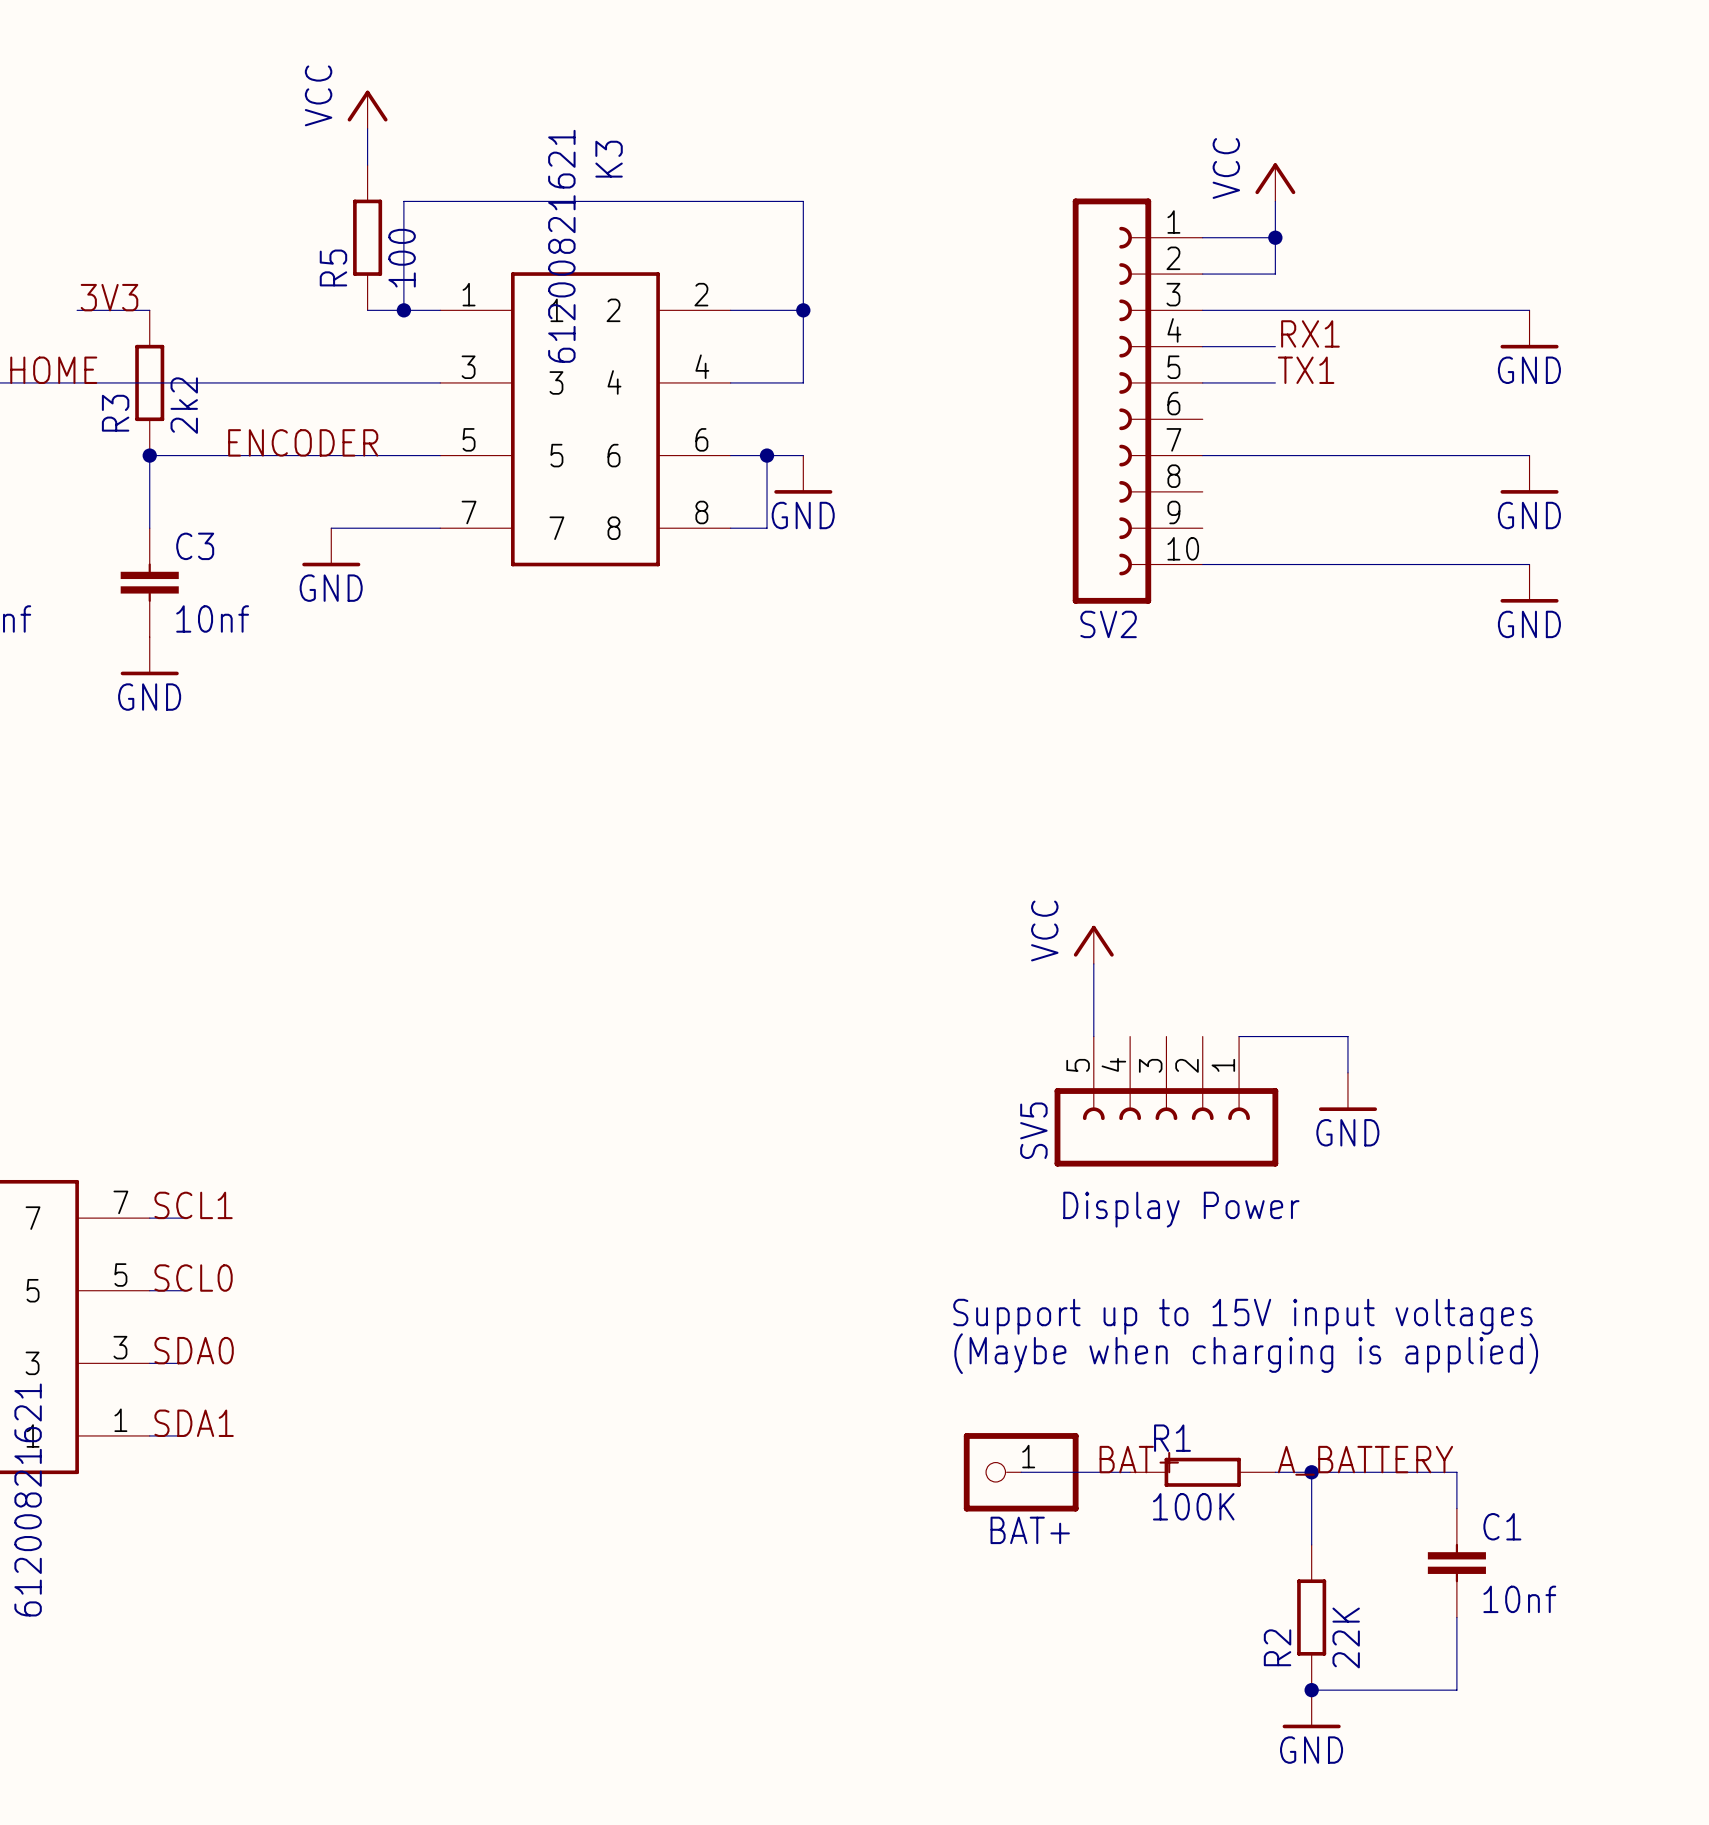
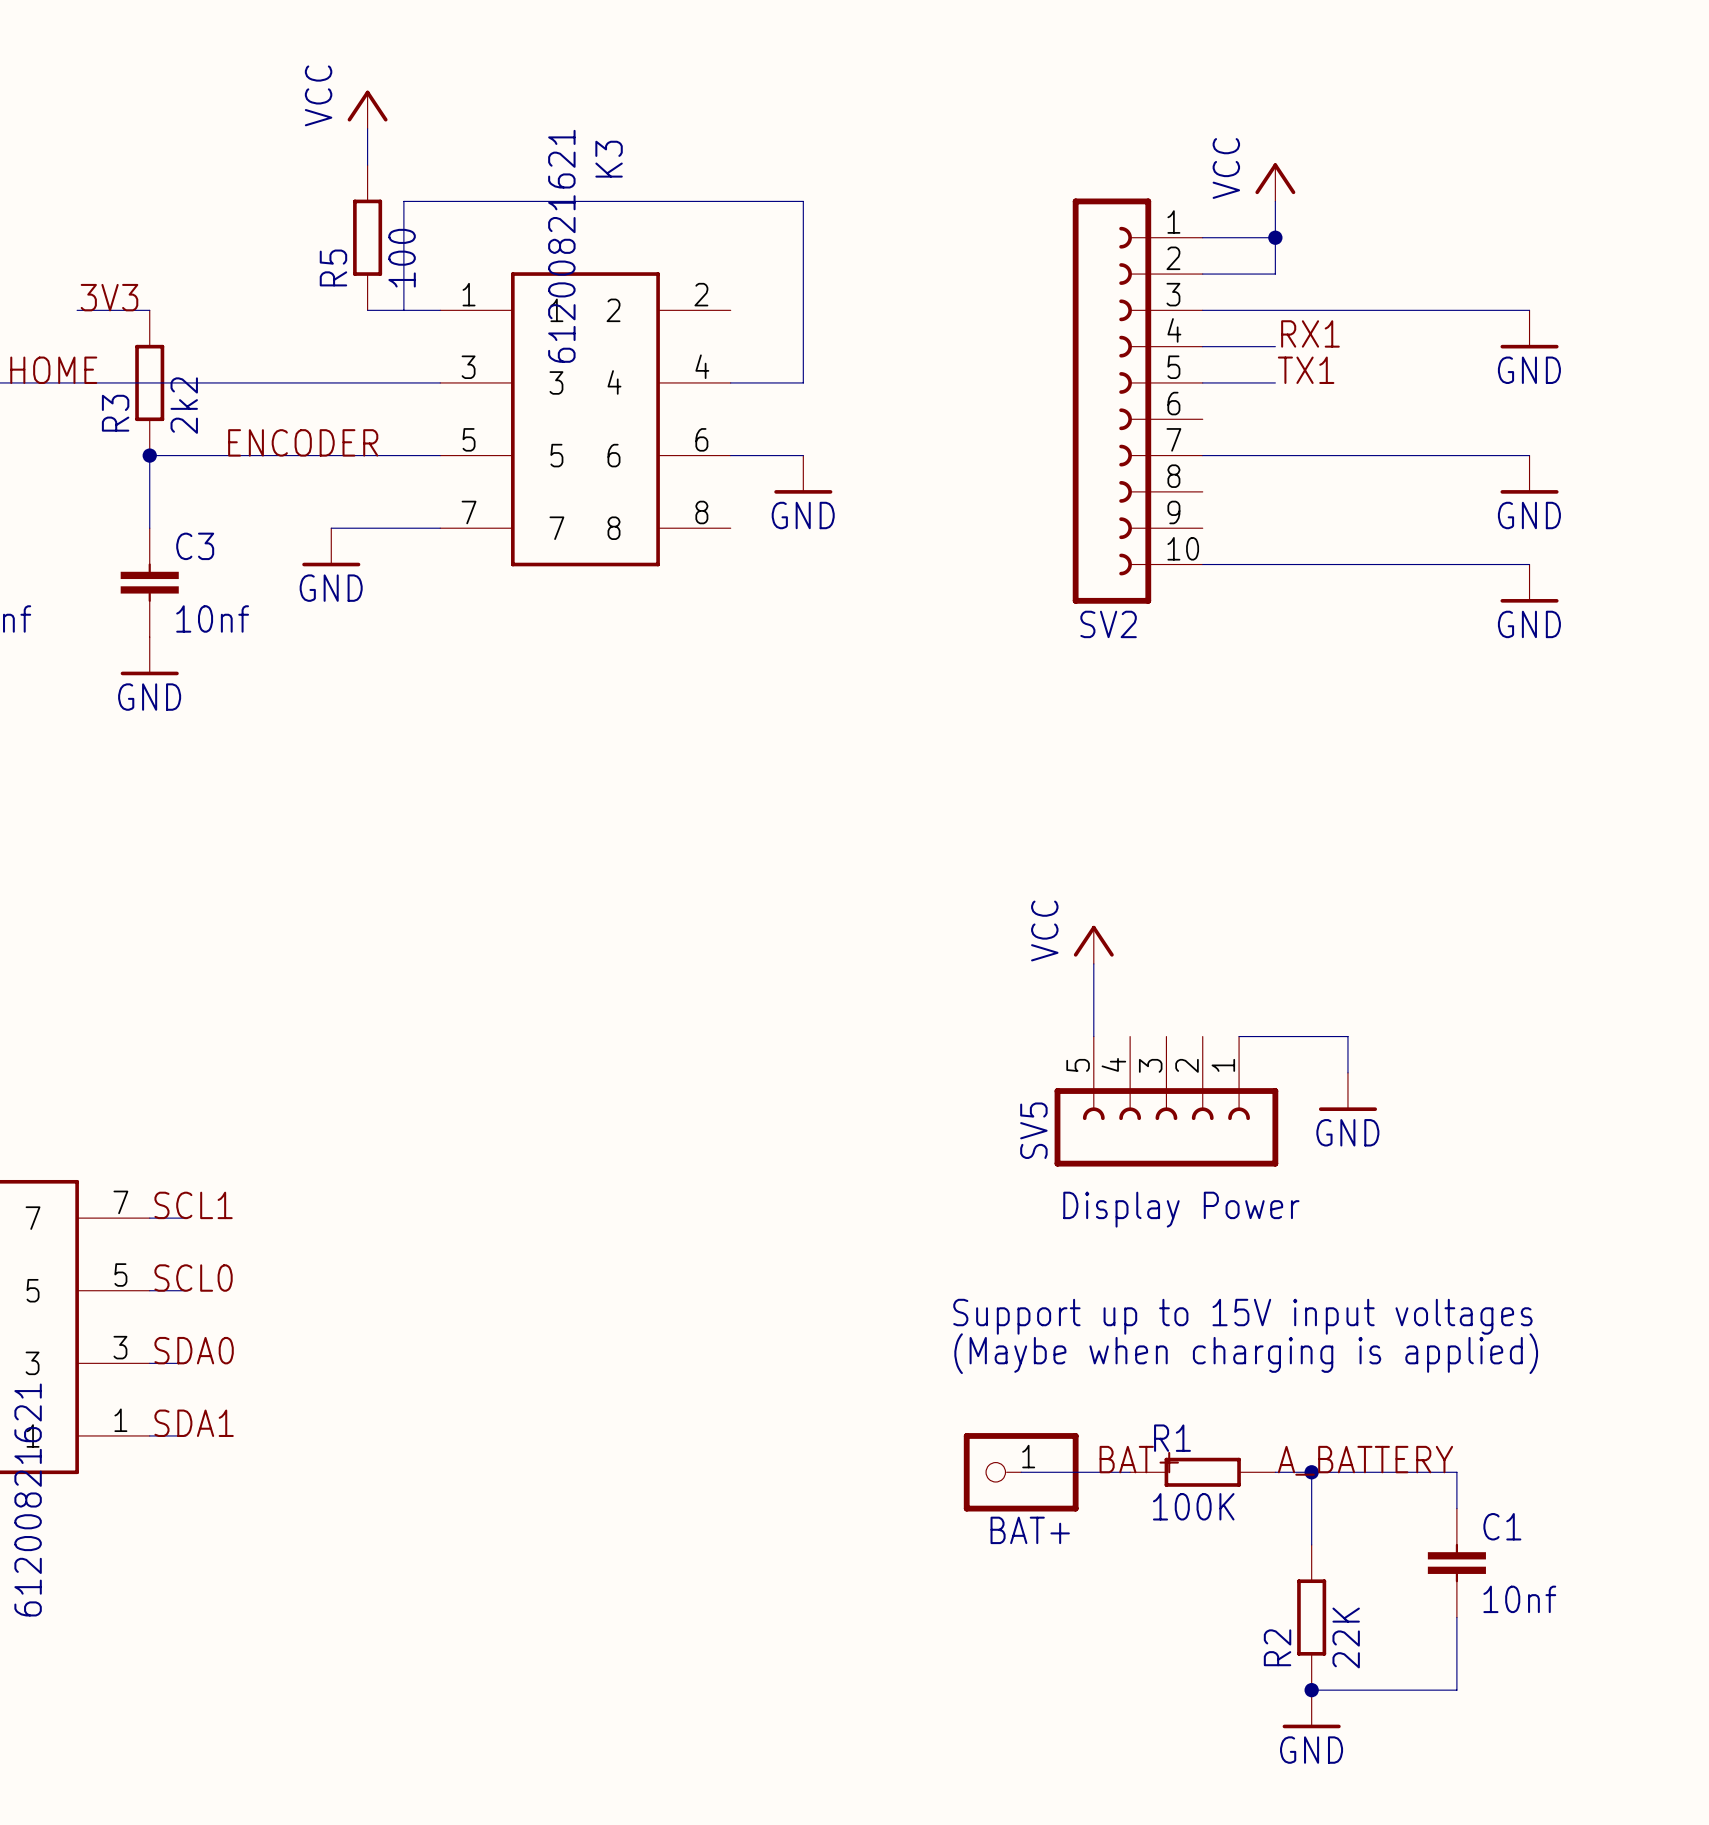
junction: (403, 310) -> none
wire: (730, 310) (803, 310) -> none
junction: (803, 310) -> none
wire: (767, 455) (767, 528) (730, 528) -> none
junction: (767, 455) -> none

